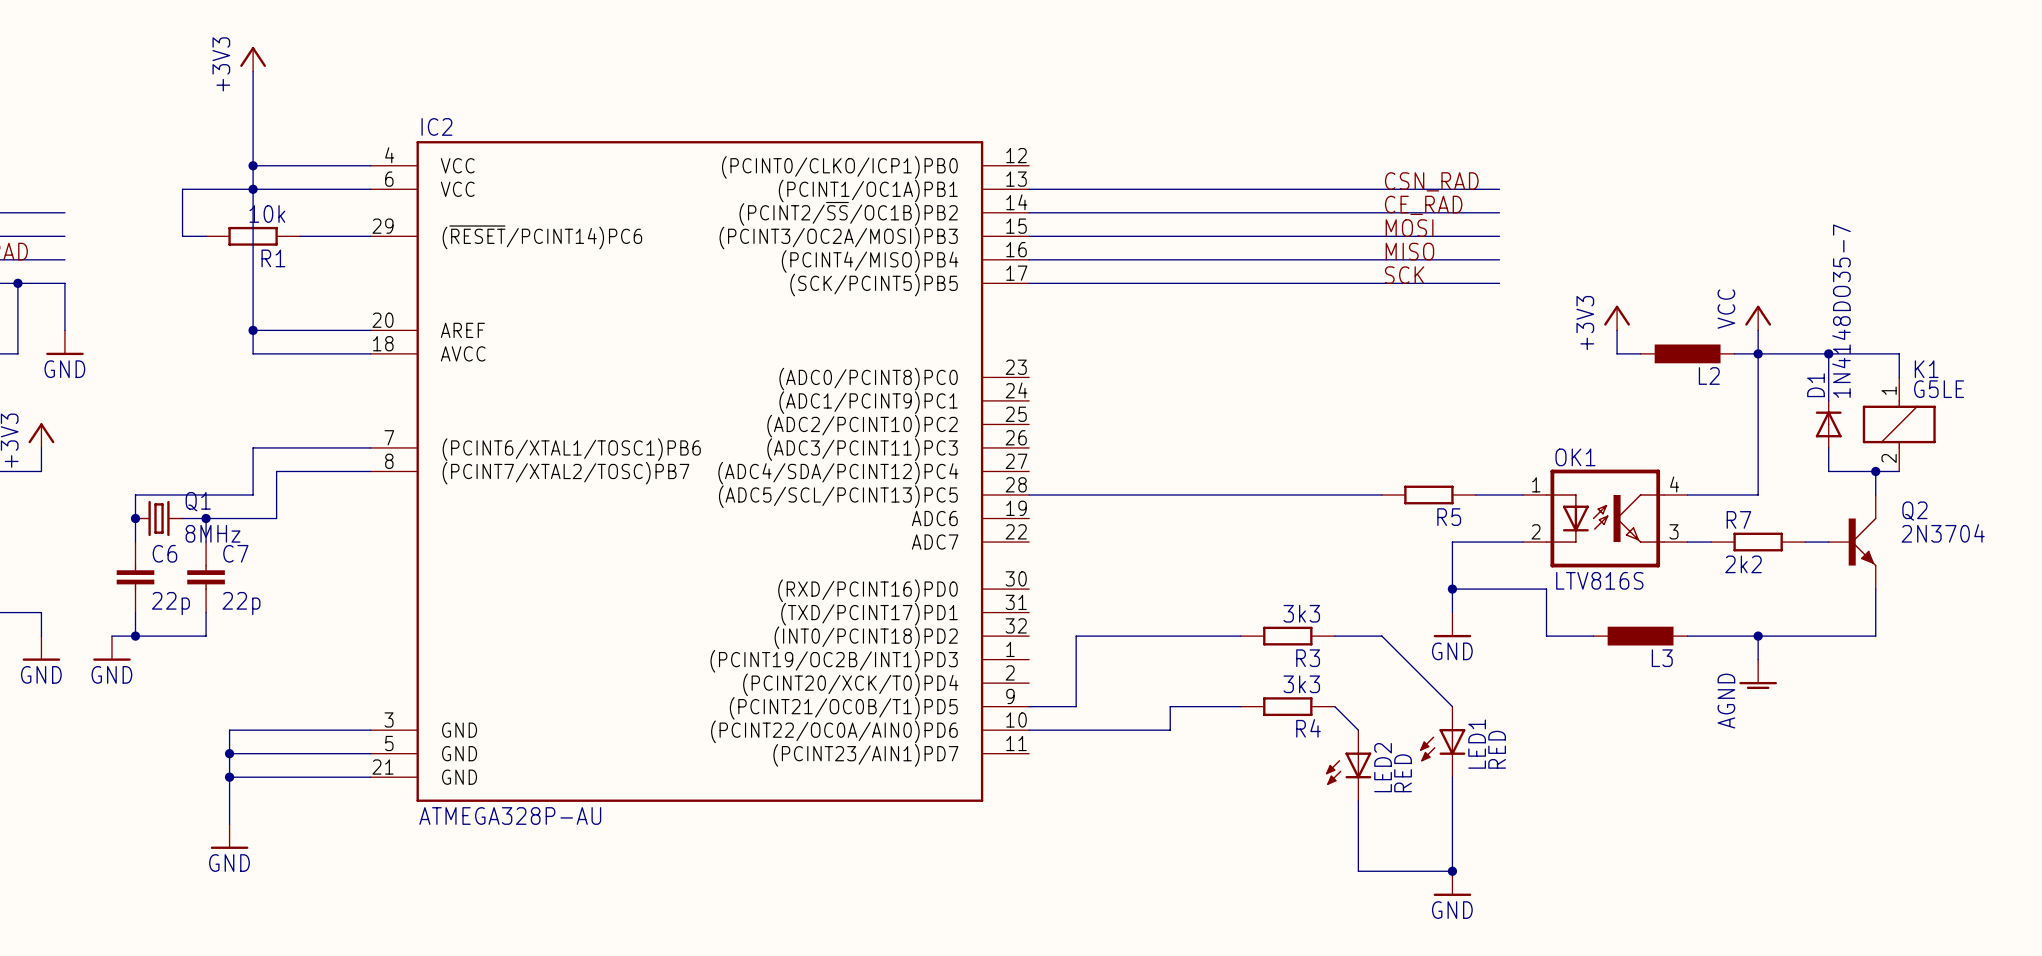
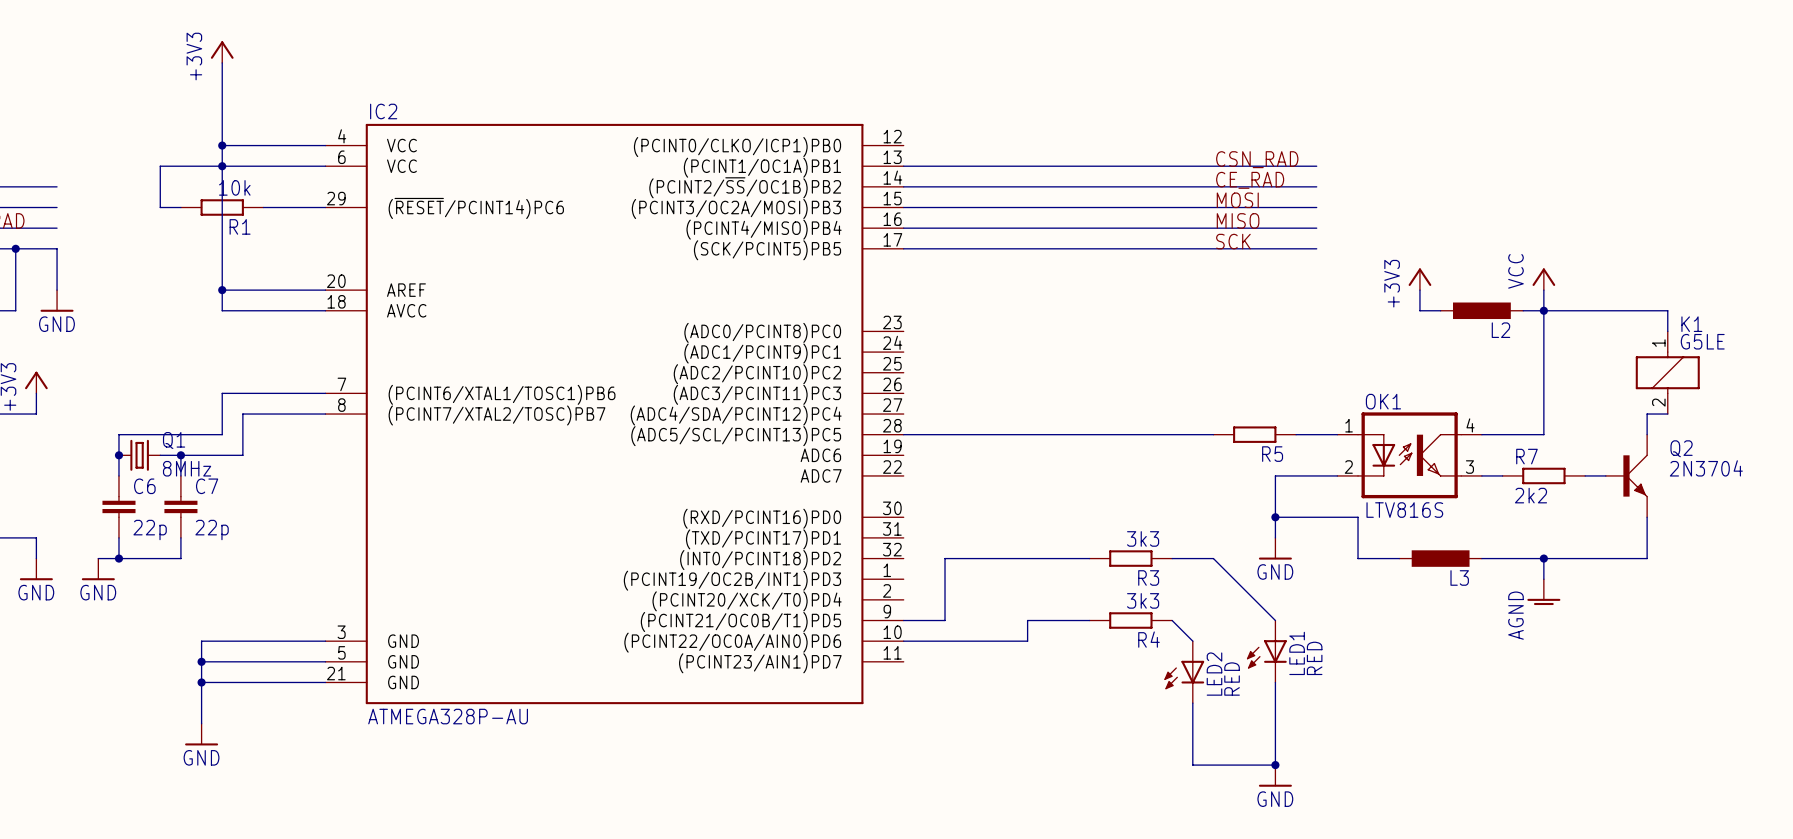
wire: (1828, 353) (1828, 400) -> none
junction: (1828, 353) -> none
D1: 1N4148DO35-7 (1828, 424) -> none
wire: (1828, 447) (1828, 471) (1875, 471) -> none
junction: (1875, 471) -> none

